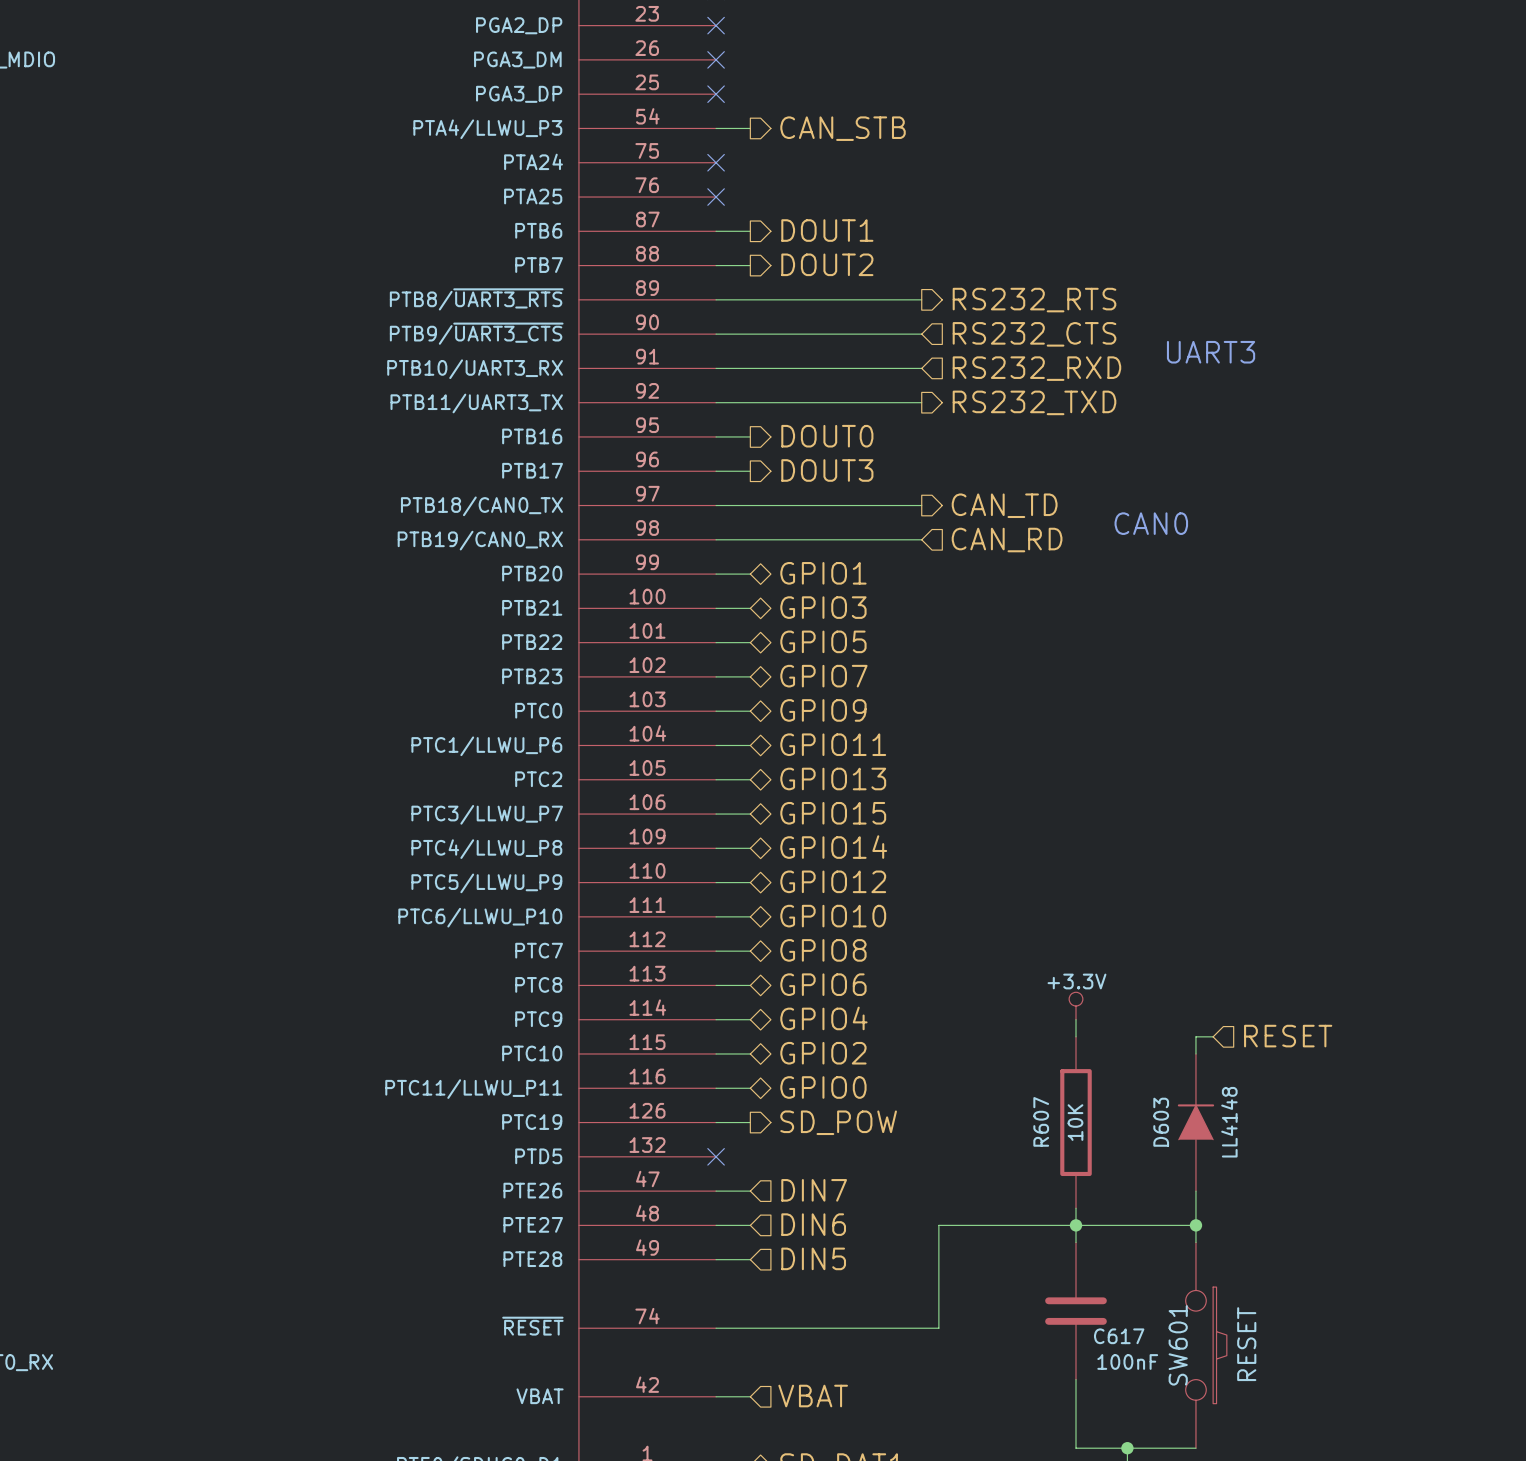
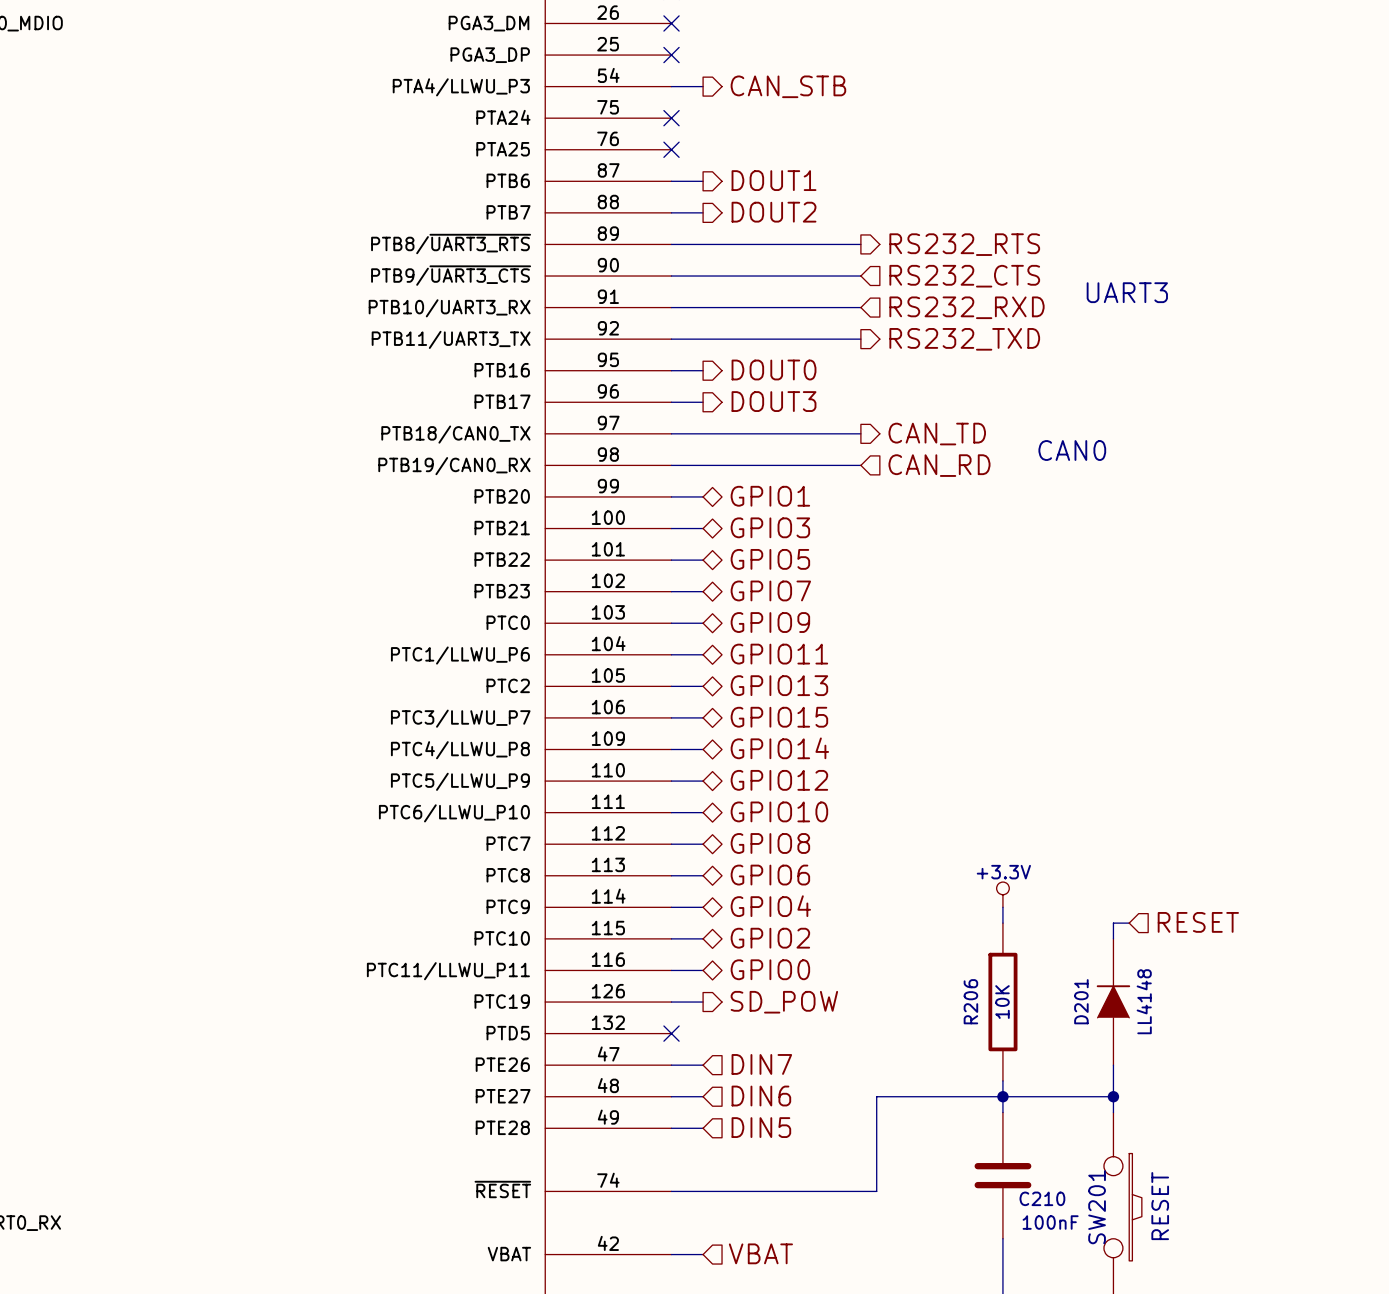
R607 name: R607 (1041, 1121) -> R206 (970, 1001)
D603 name: D603 (1161, 1122) -> D201 (1081, 1001)
C617 name: C617 (1119, 1336) -> C210 (1042, 1198)
SW601 name: SW601 (1178, 1345) -> SW201 (1097, 1207)

